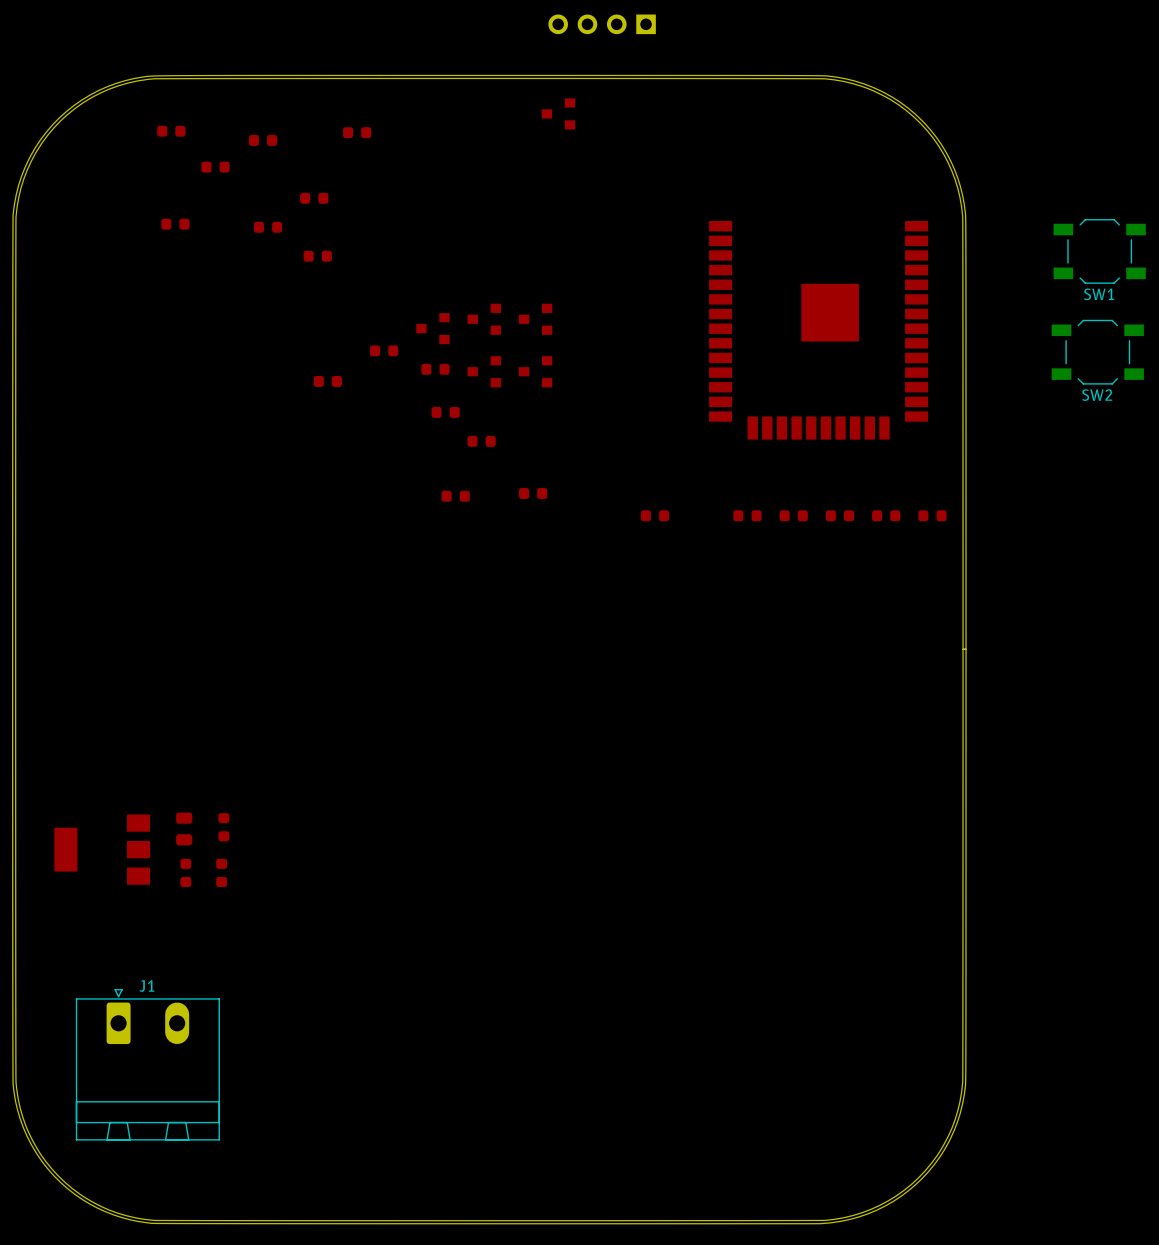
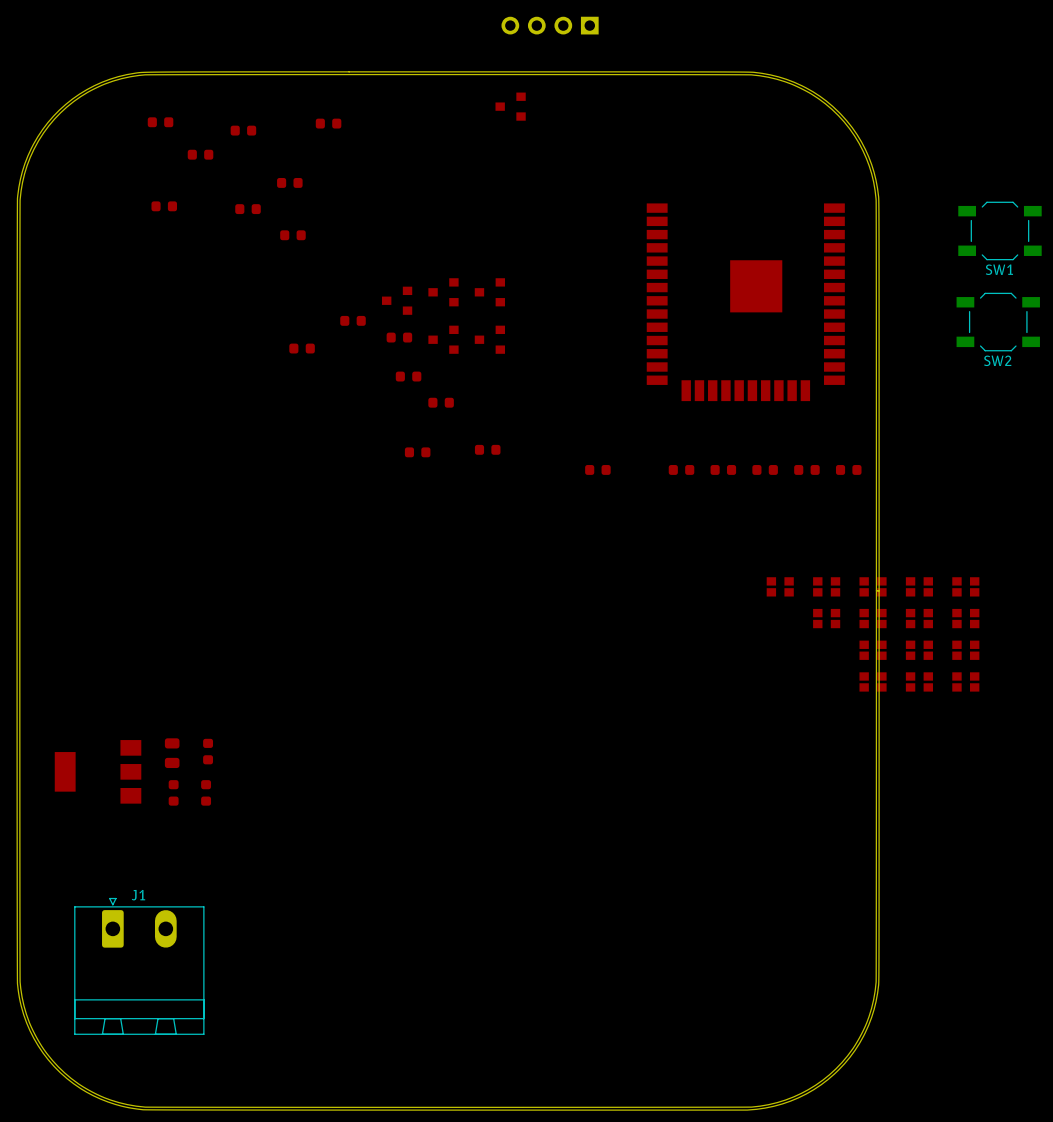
part: none -> (780, 586)
part: none -> (826, 586)
part: none -> (873, 586)
part: none -> (919, 586)
part: none -> (965, 586)
part: none -> (826, 618)
part: none -> (873, 618)
part: none -> (919, 618)
part: none -> (965, 618)
part: none -> (873, 650)
part: none -> (919, 650)
part: none -> (965, 650)
part: none -> (873, 681)
part: none -> (919, 681)
part: none -> (965, 681)

